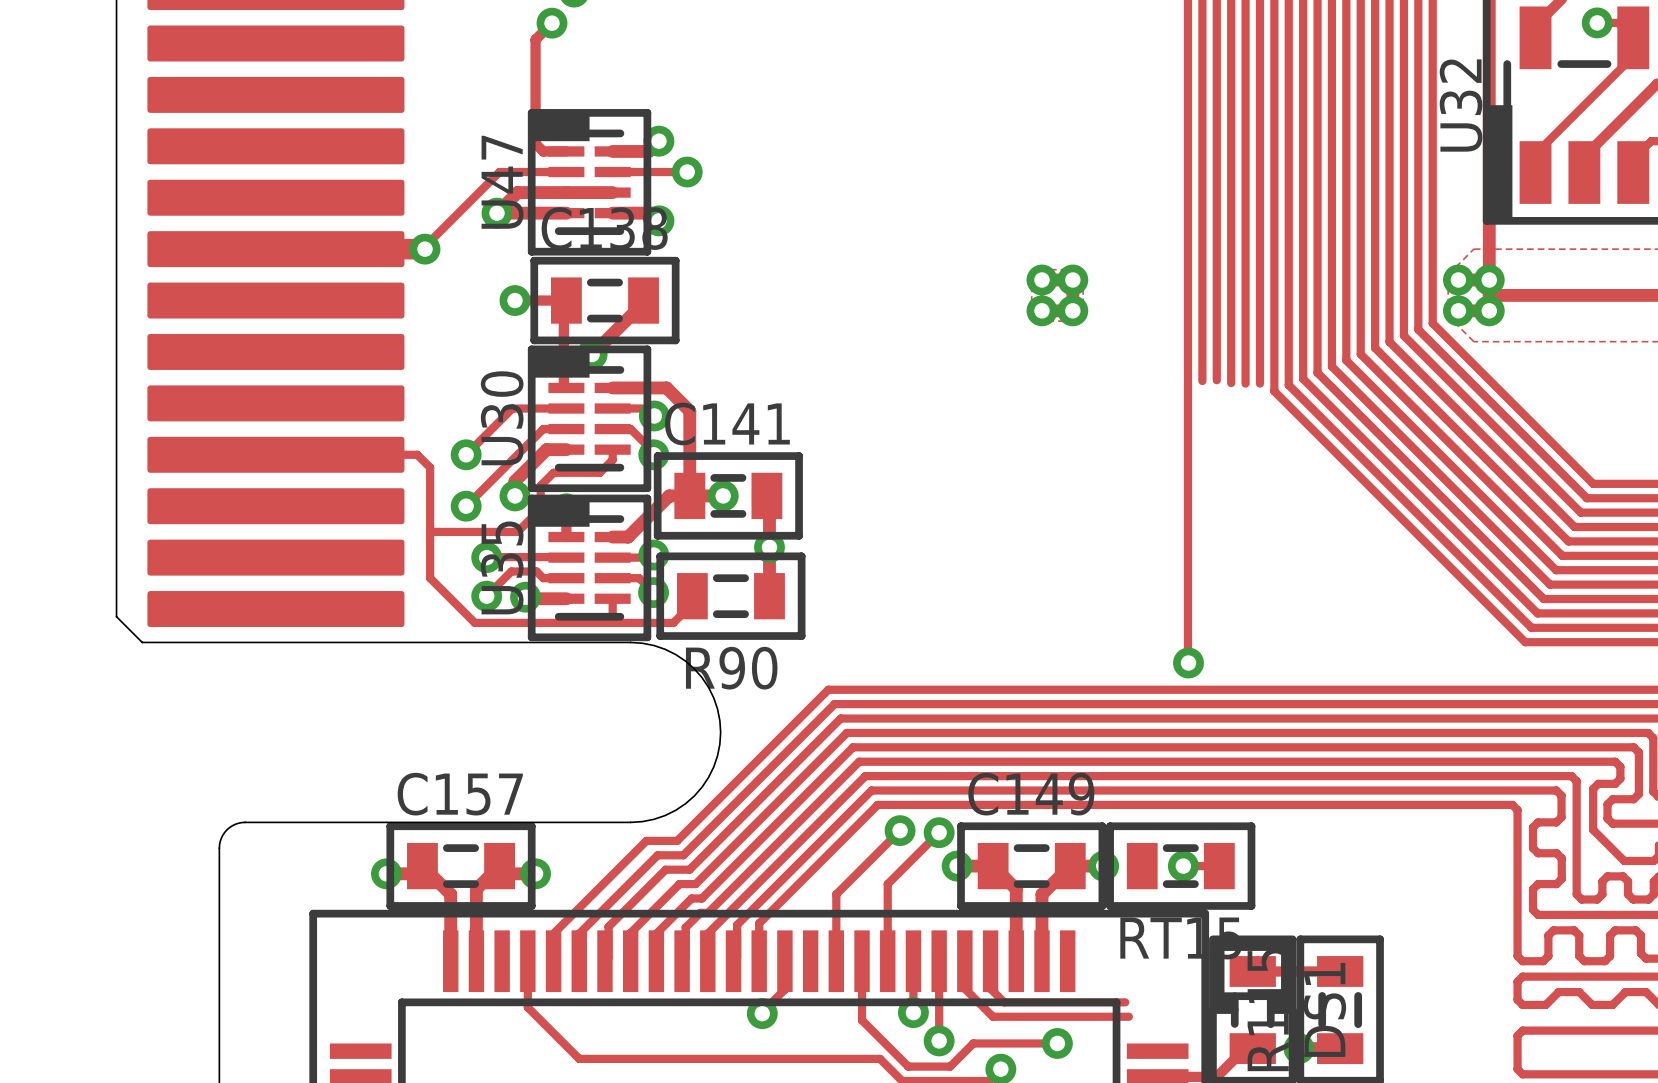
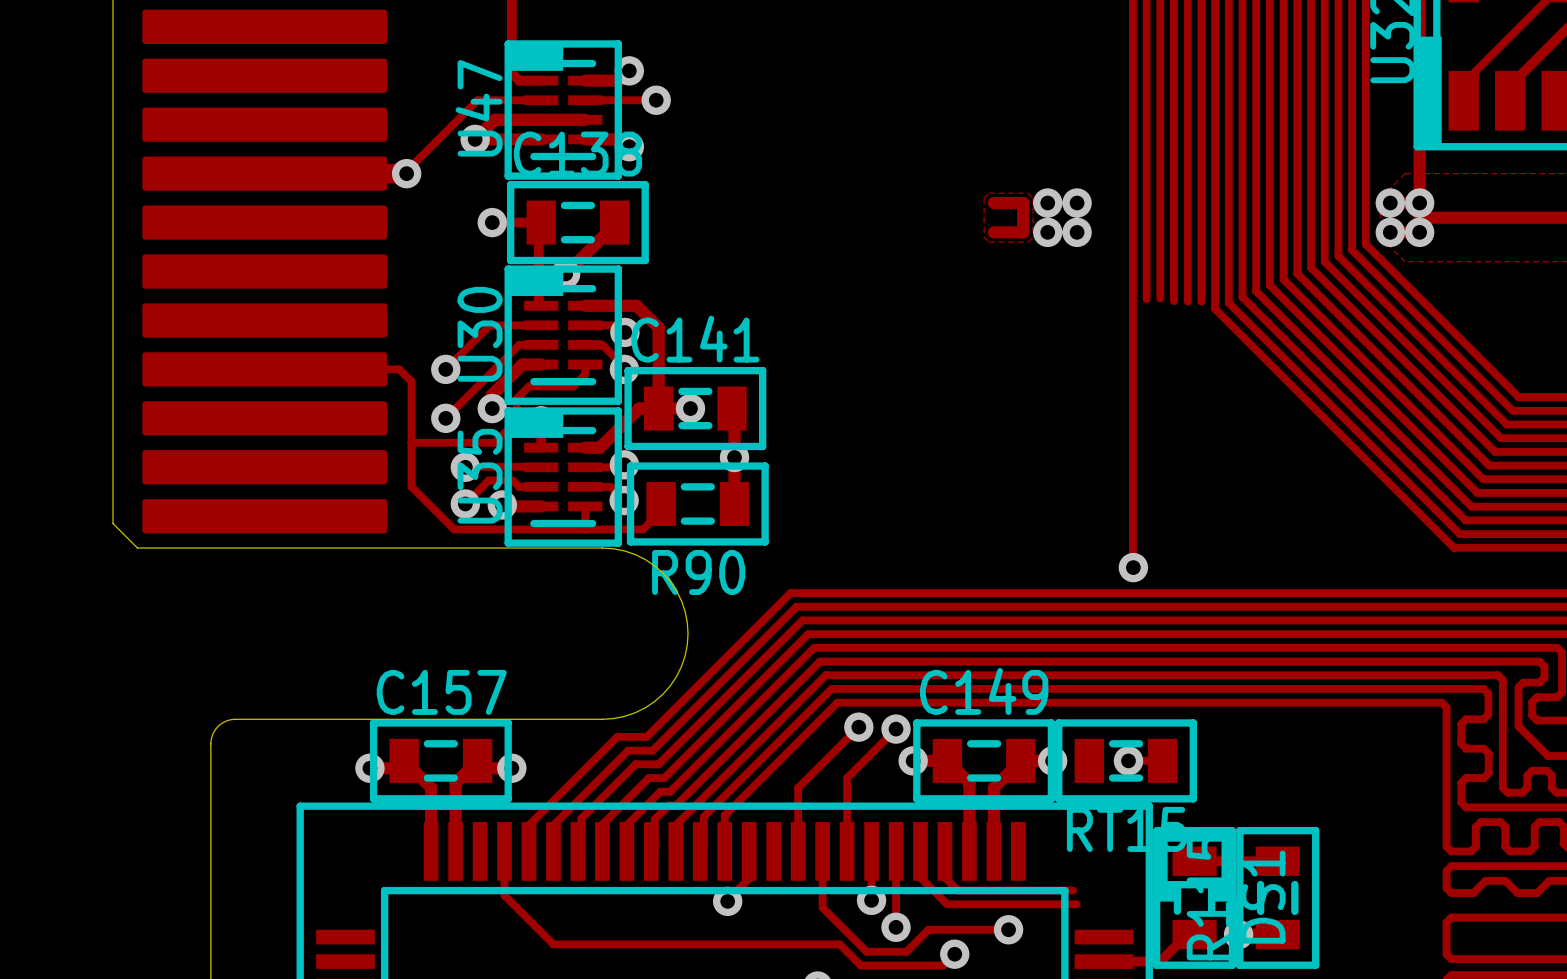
via: (1041, 279) -> none
via: (1072, 279) -> none
via: none -> (1047, 203)
via: none -> (1077, 203)
via: (1041, 310) -> none
via: (1072, 310) -> none
via: none -> (1047, 232)
via: none -> (1077, 232)

